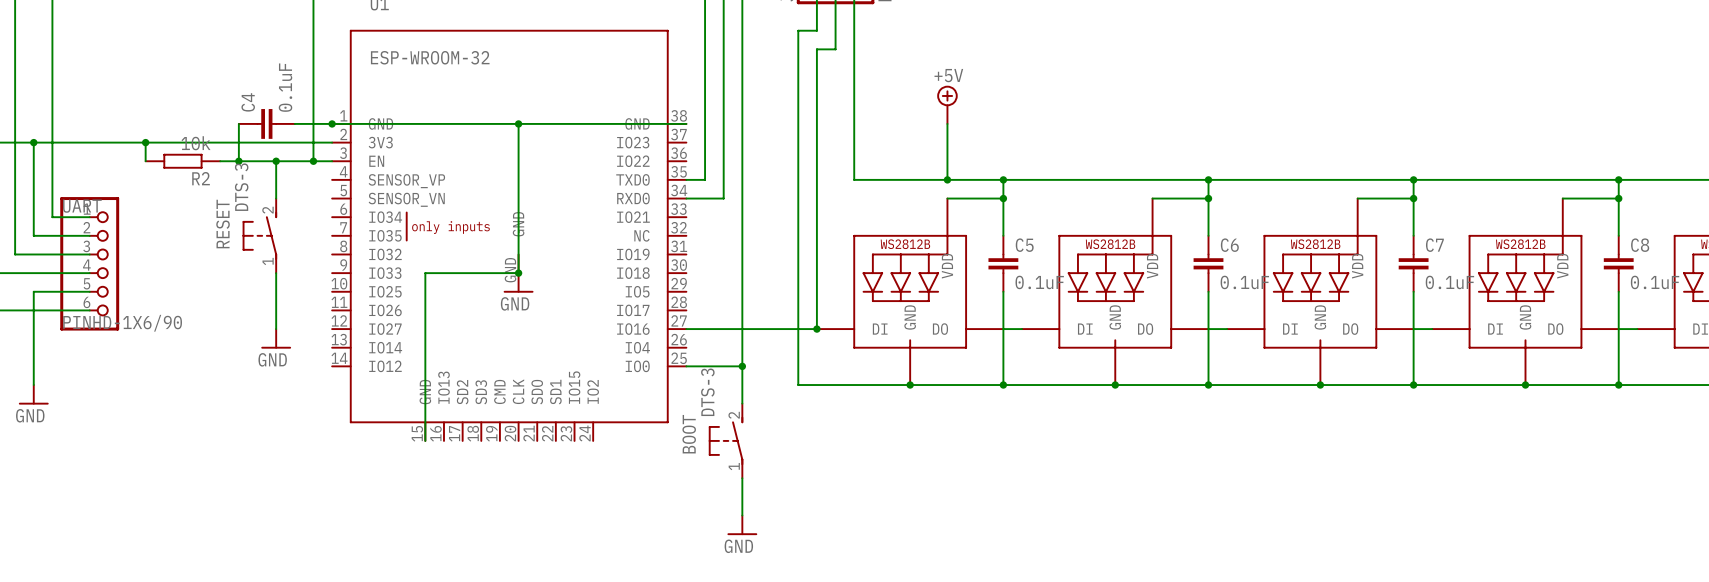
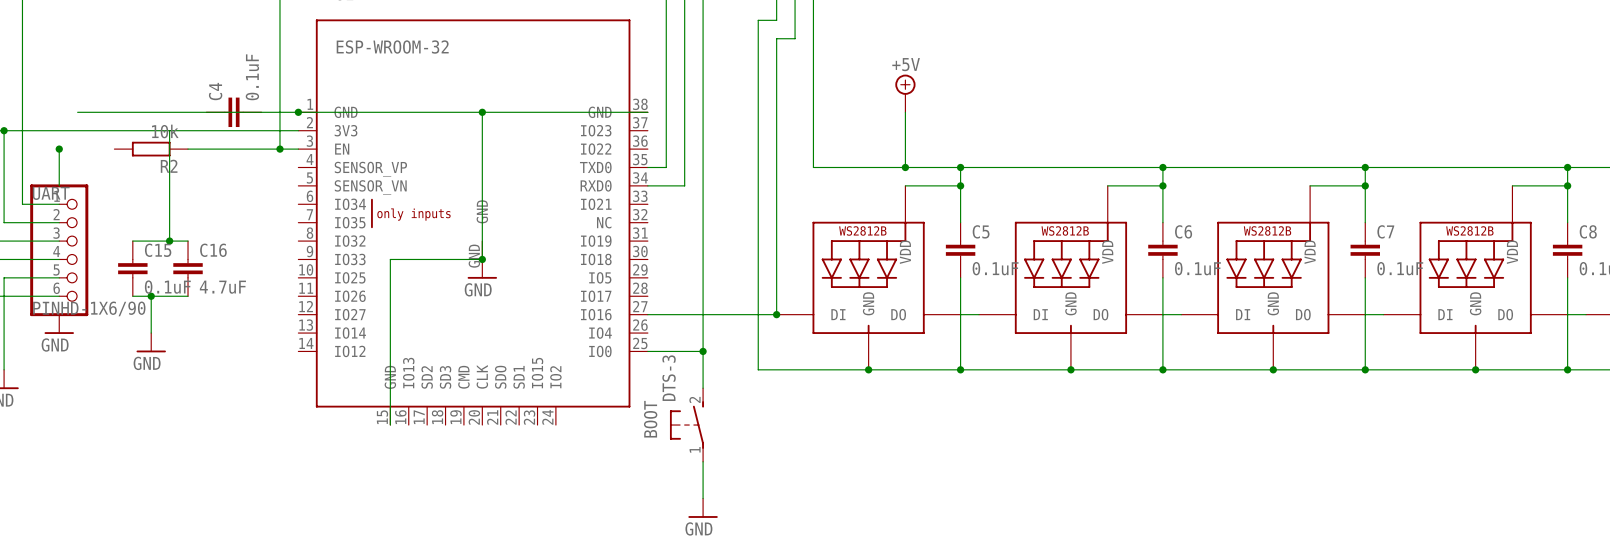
wire: none -> (77, 112) (261, 112)
wire: (238, 123) (238, 161) -> (59, 149) (59, 185)
wire: (145, 142) (145, 161) -> none
junction: (145, 142) -> none
wire: none -> (169, 130) (169, 241)
junction: none -> (59, 149)
junction: (238, 161) -> none
wire: (276, 161) (276, 198) -> (151, 296) (151, 333)
junction: (276, 161) -> none
RESET: DTS-3 (259, 235) -> none
wire: none -> (132, 241) (188, 241)
junction: none -> (169, 241)
wire: (276, 273) (276, 329) -> none
C15: none -> 0.1uF (132, 268)
C16: none -> 4.7uF (188, 268)
wire: none -> (132, 296) (188, 296)
junction: none -> (151, 296)
power symbol: none -> GND (59, 324)
power symbol: GND (276, 338) -> none
power symbol: none -> GND (151, 342)

